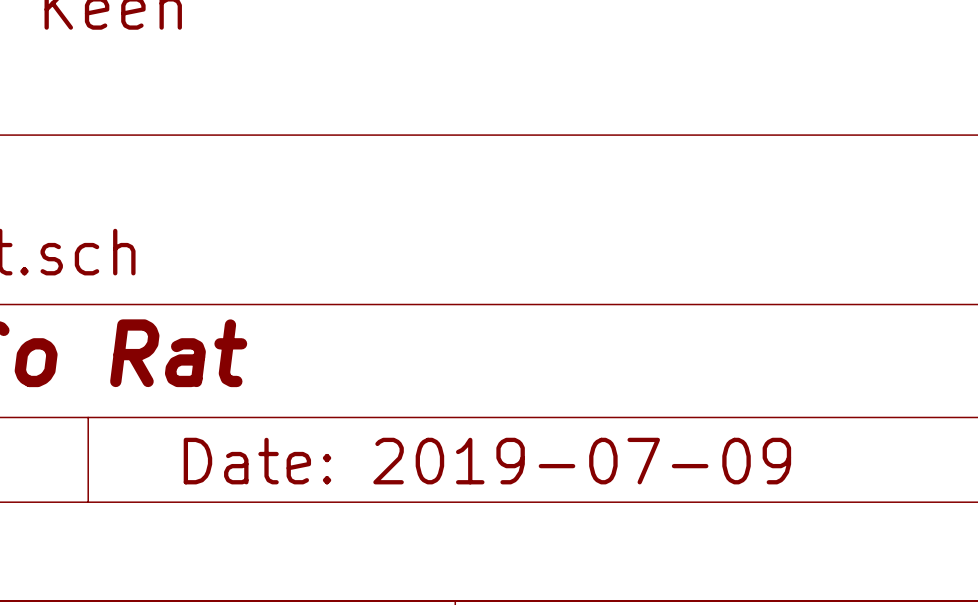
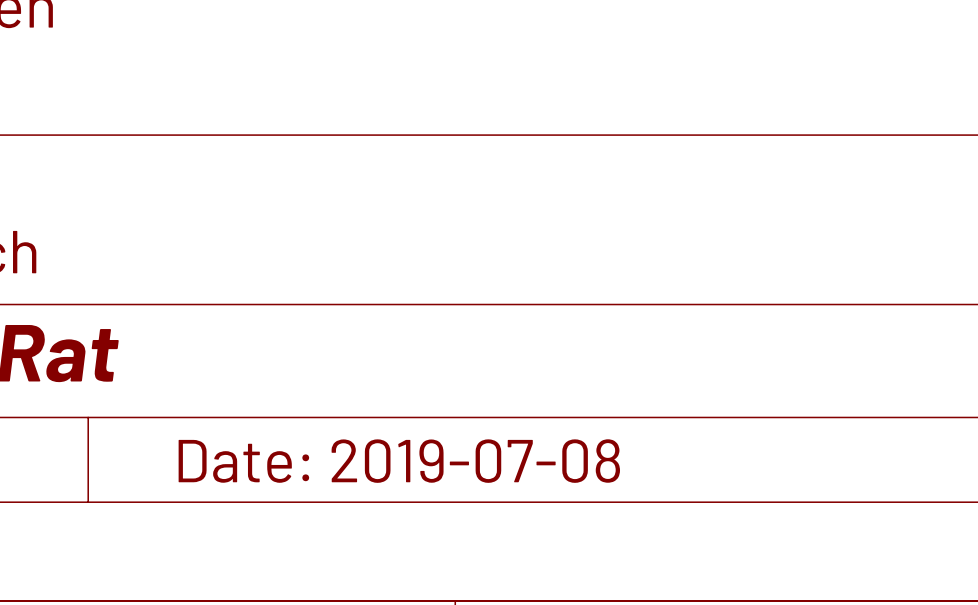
title block: Date: 2019-07-09 (487, 461) -> Date: 2019-07-08 (399, 461)

